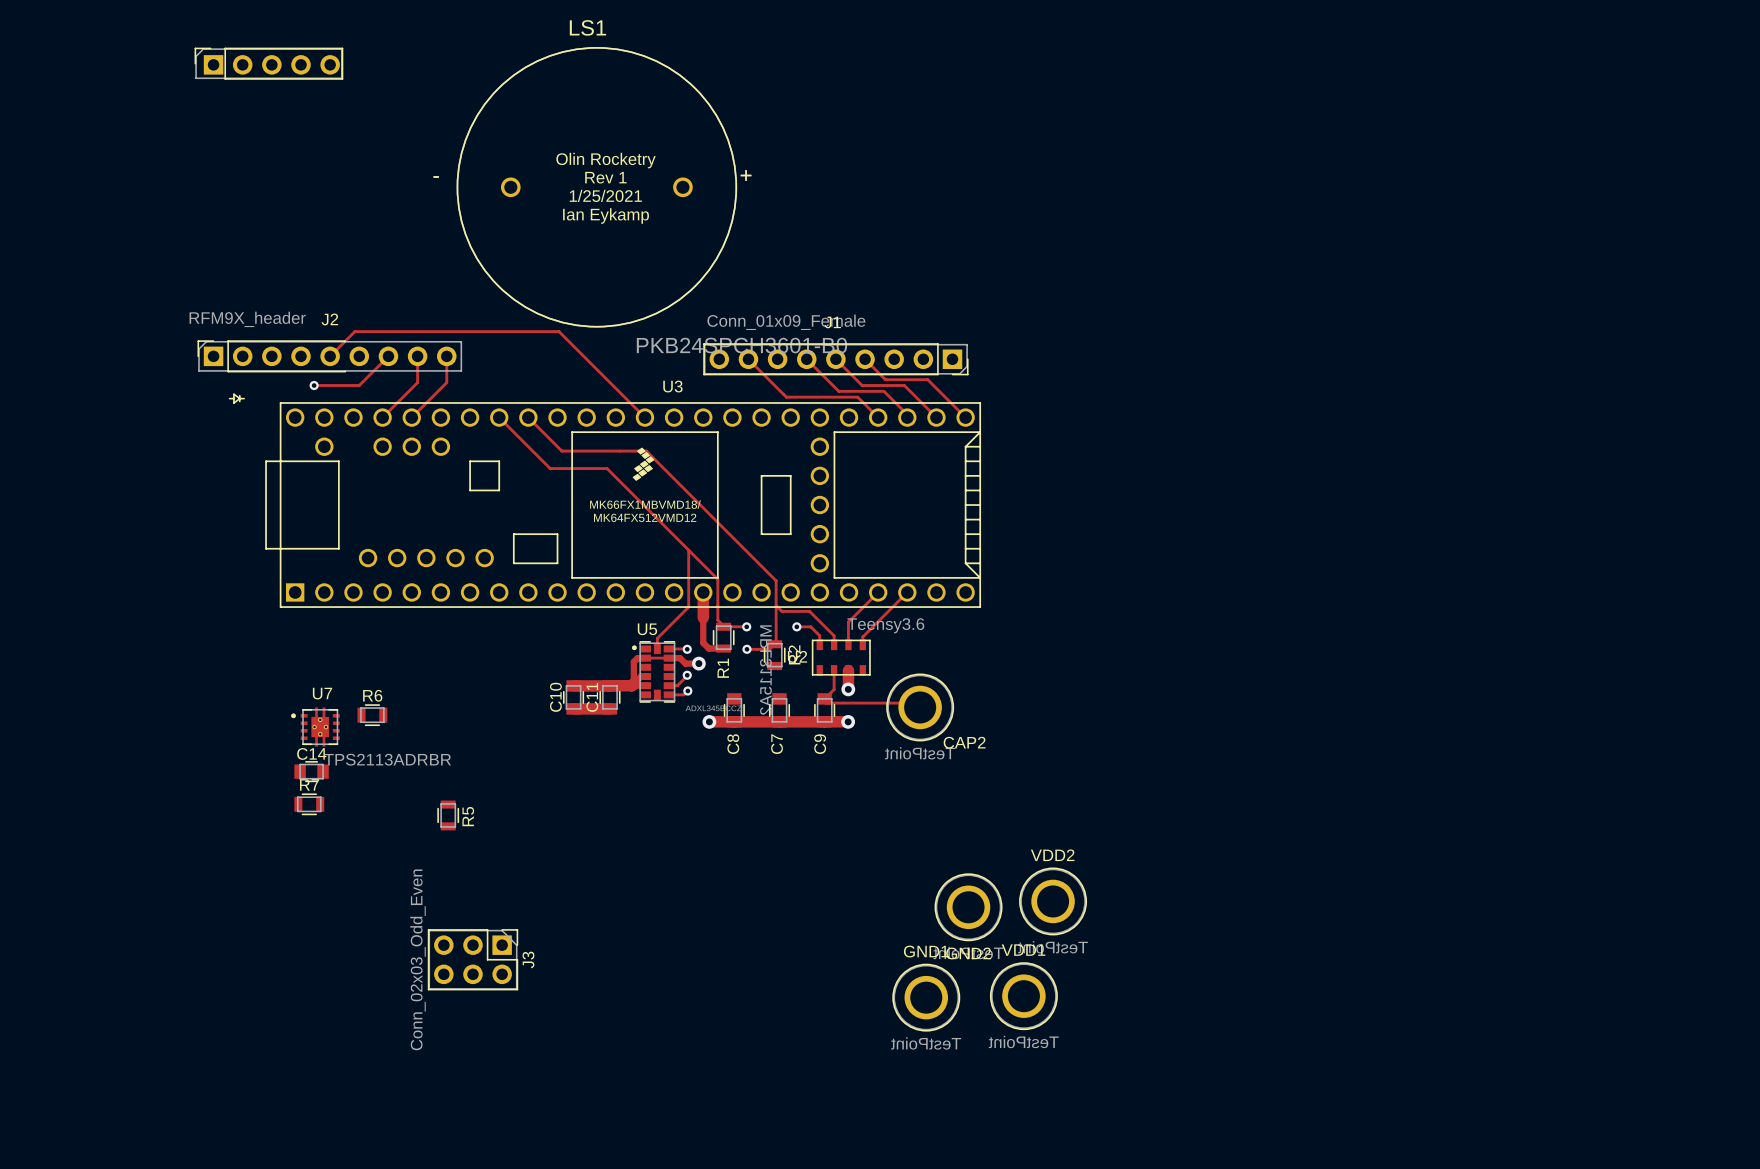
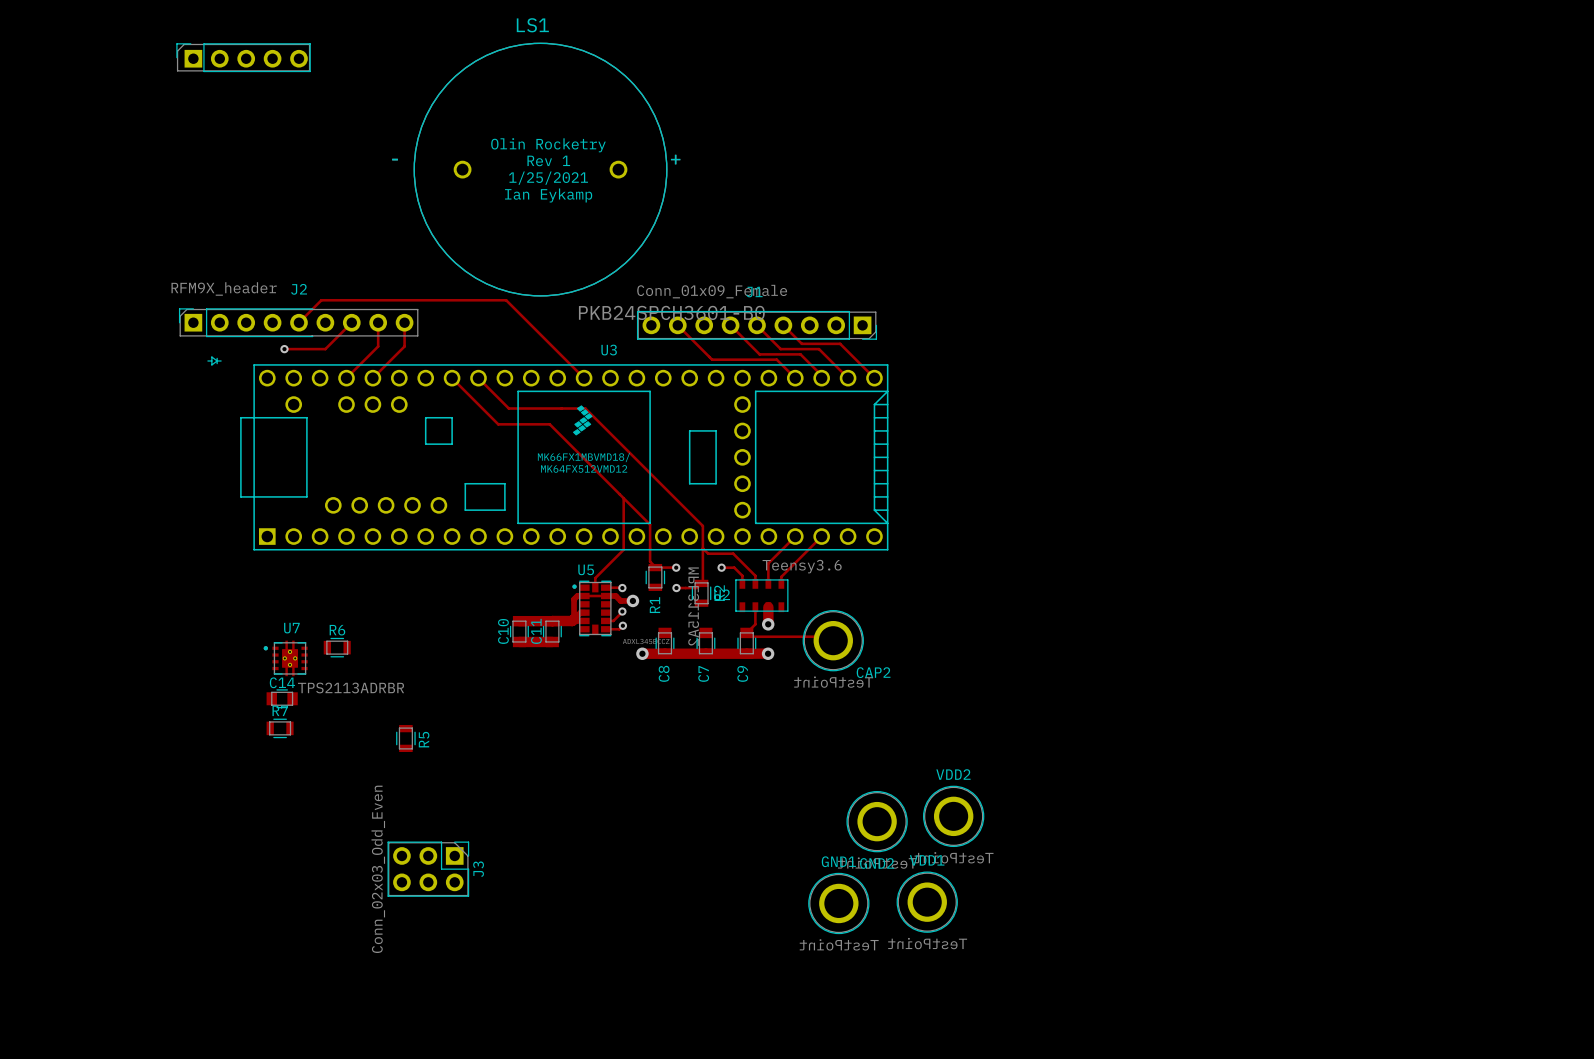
track: (703, 592) (703, 642) (708, 648) (723, 648) -> none

